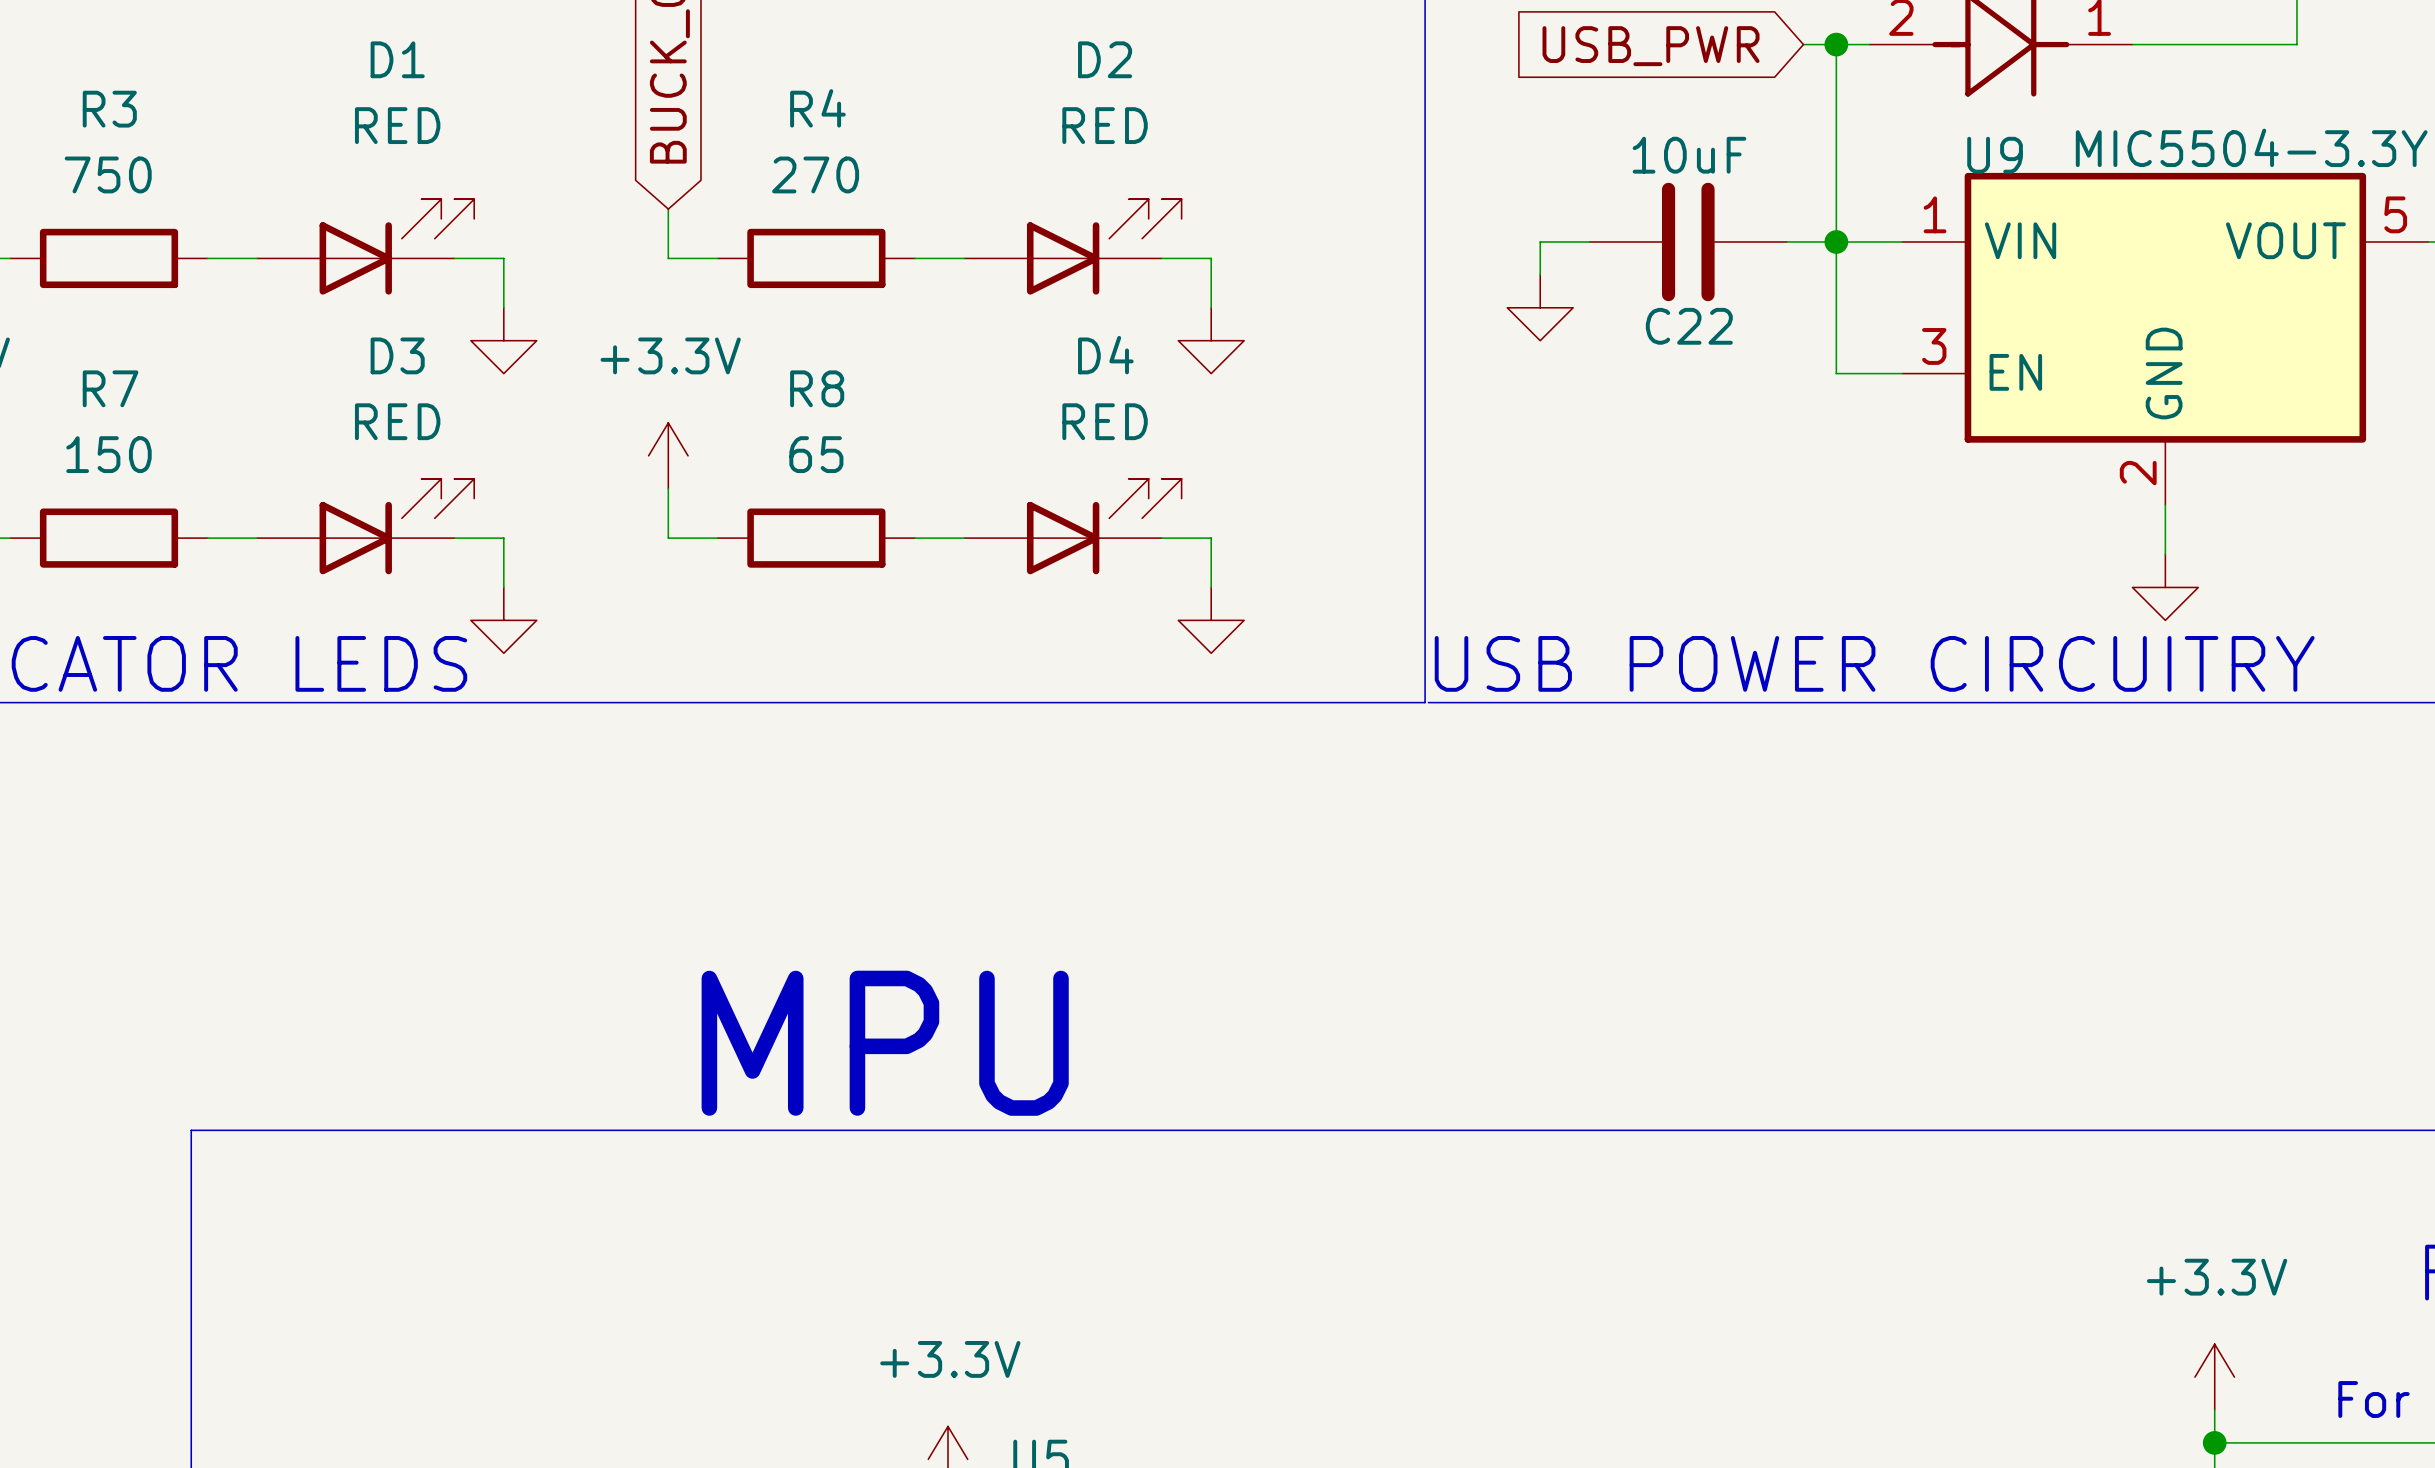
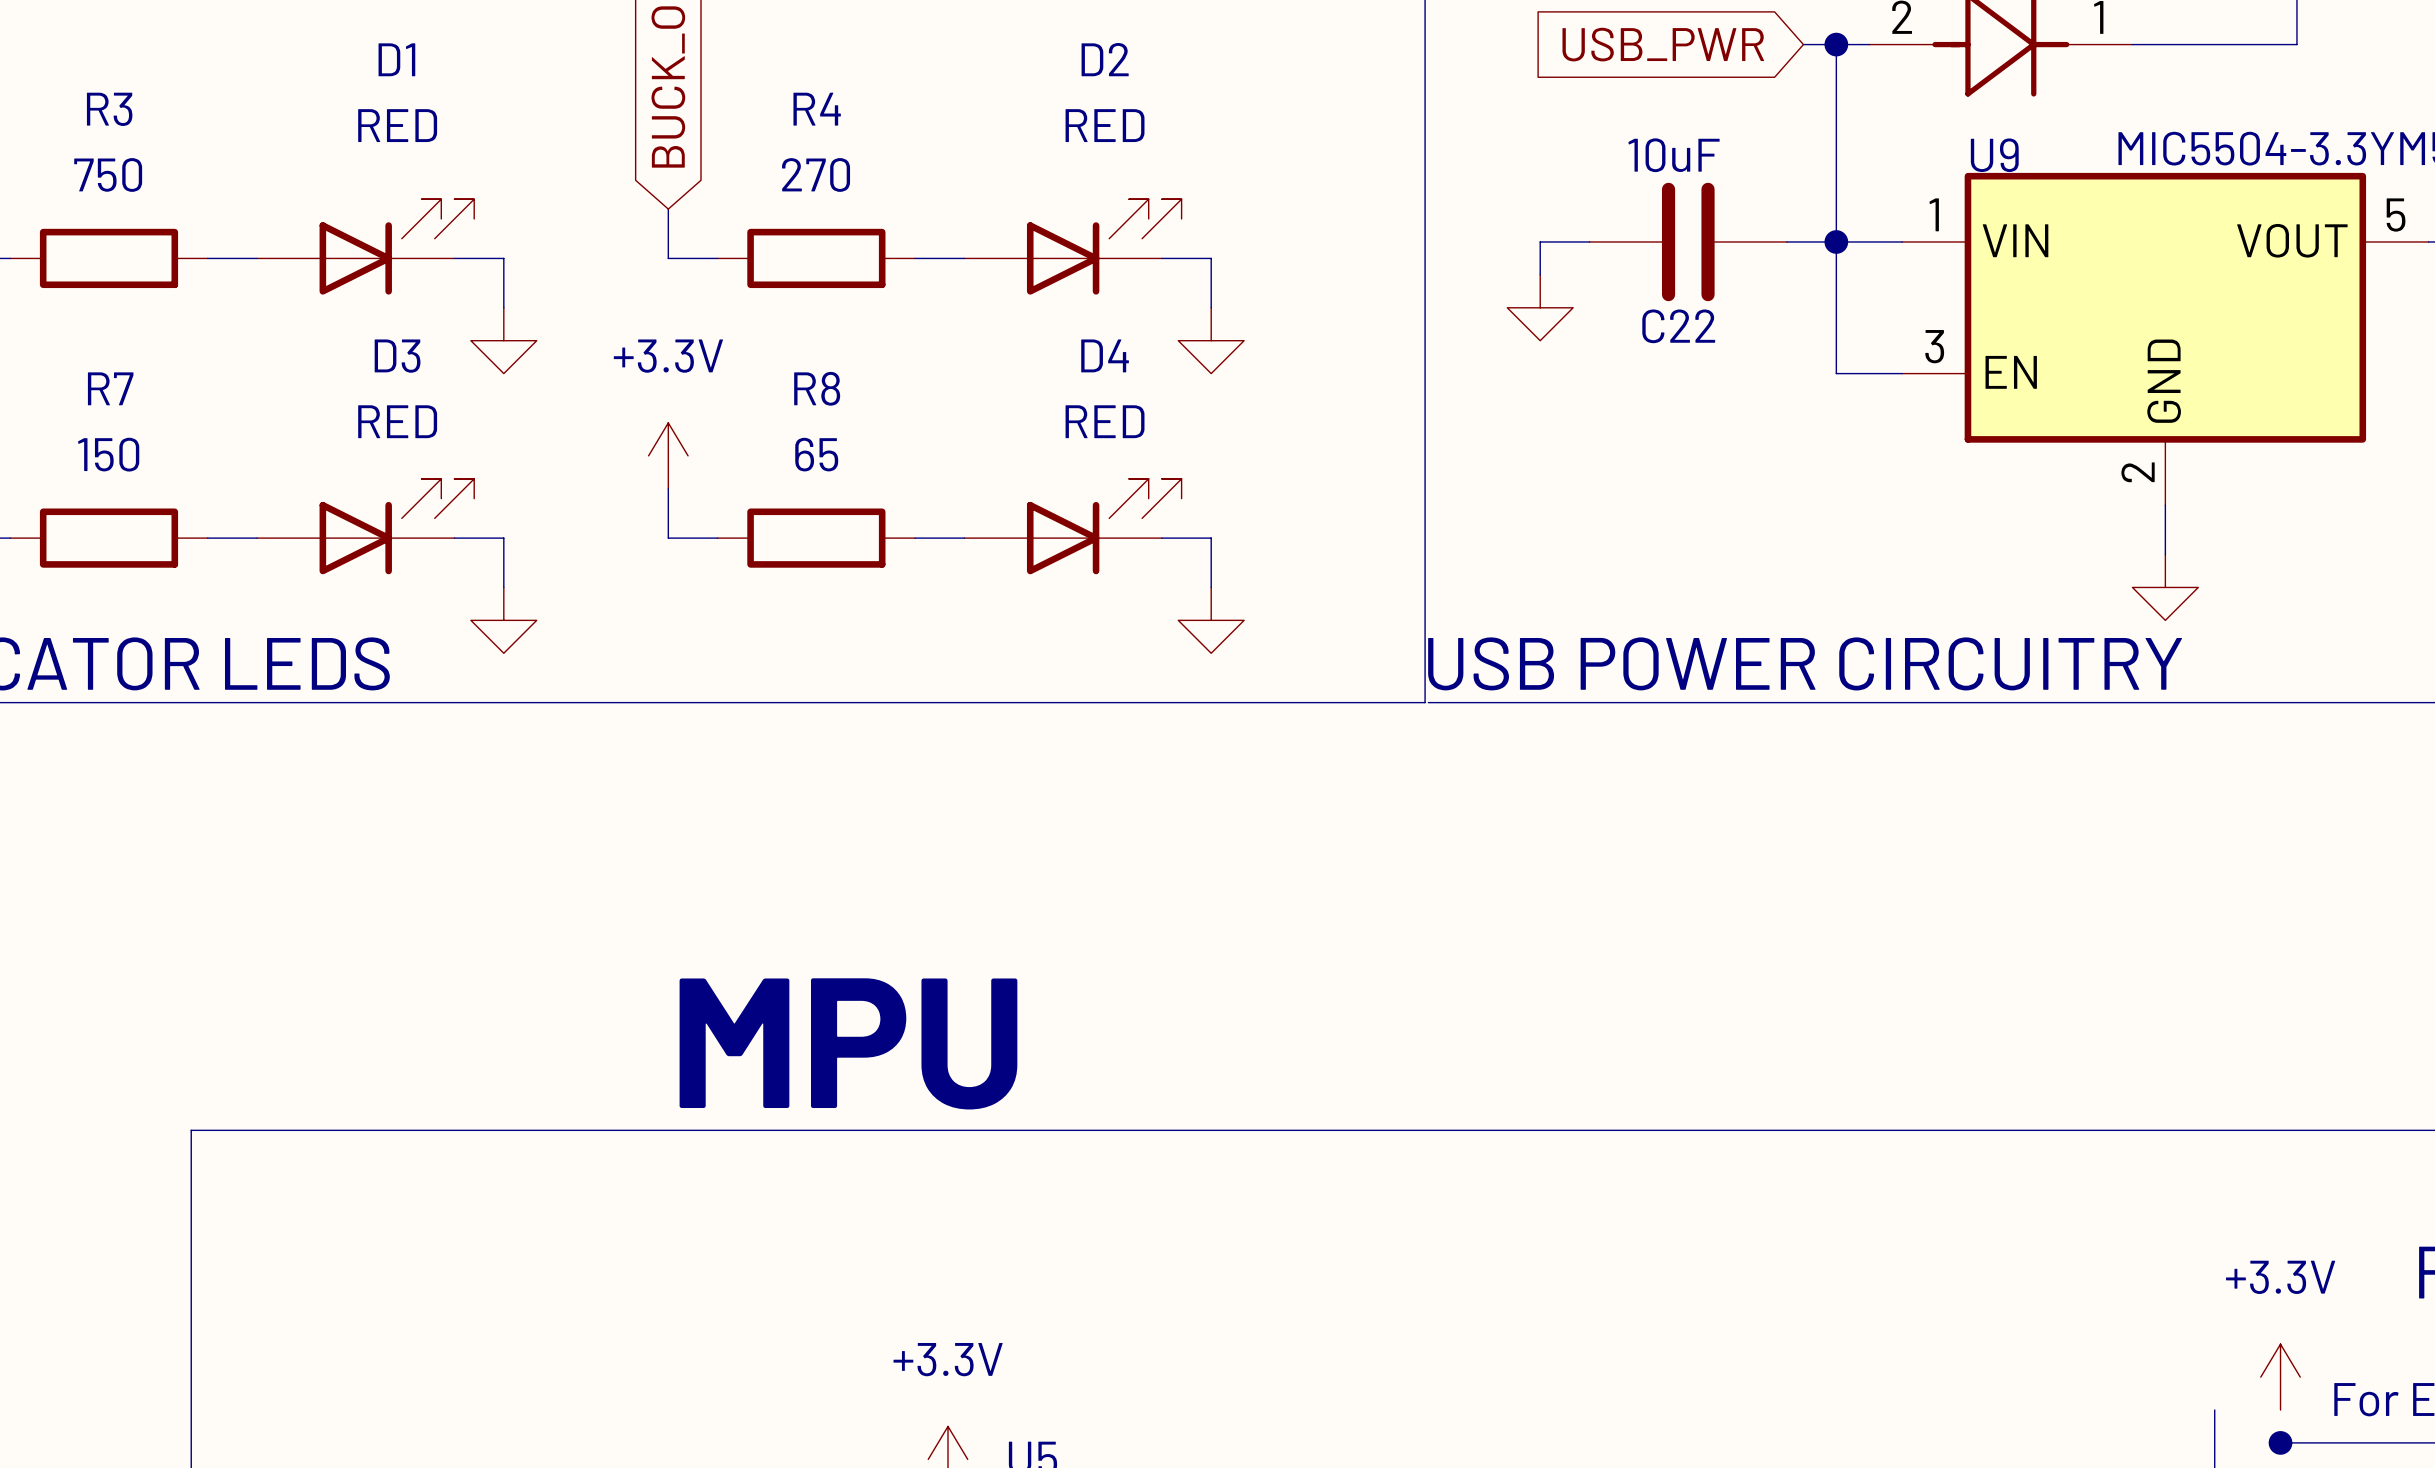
power symbol position: +3.3V (2214, 1377) -> +3.3V (2280, 1377)
wire: (2214, 1442) (2280, 1442) -> none
junction position: (2214, 1442) -> (2280, 1442)

